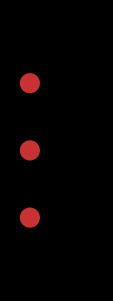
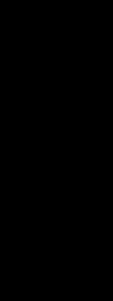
part: (29, 83) -> none
part: (29, 150) -> none
part: (29, 217) -> none

